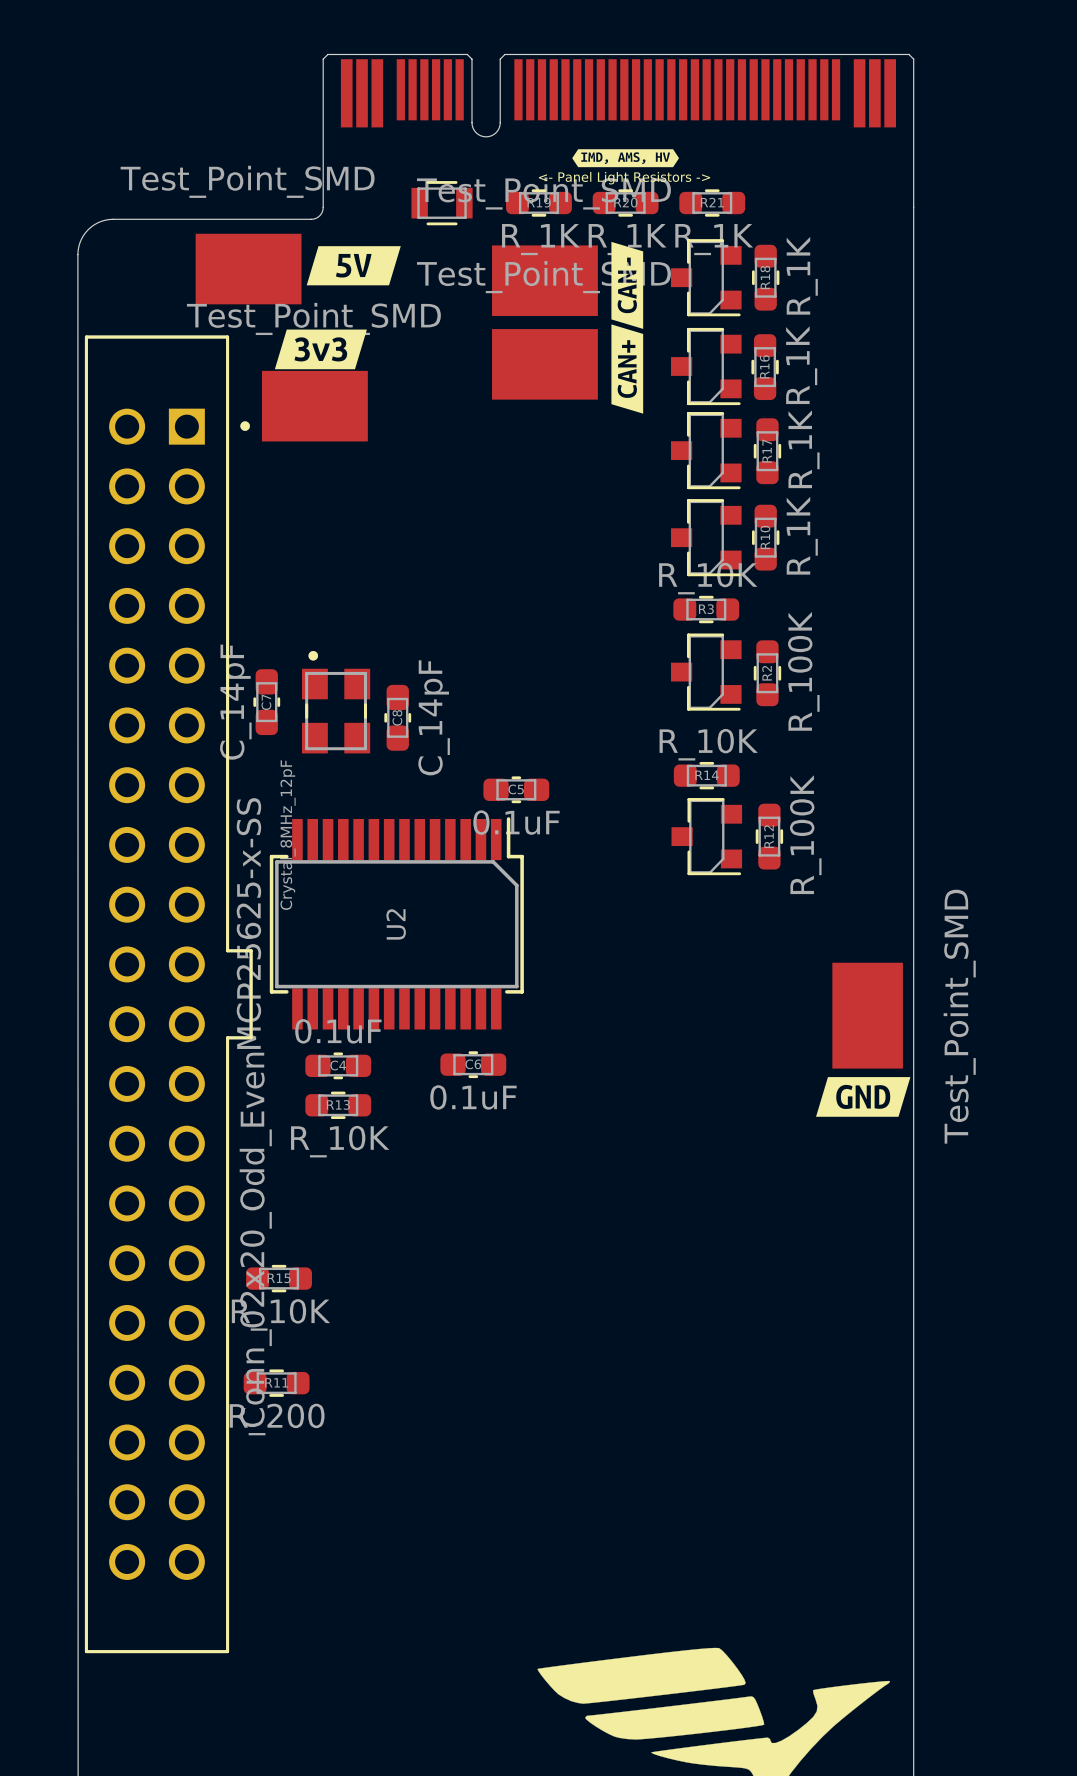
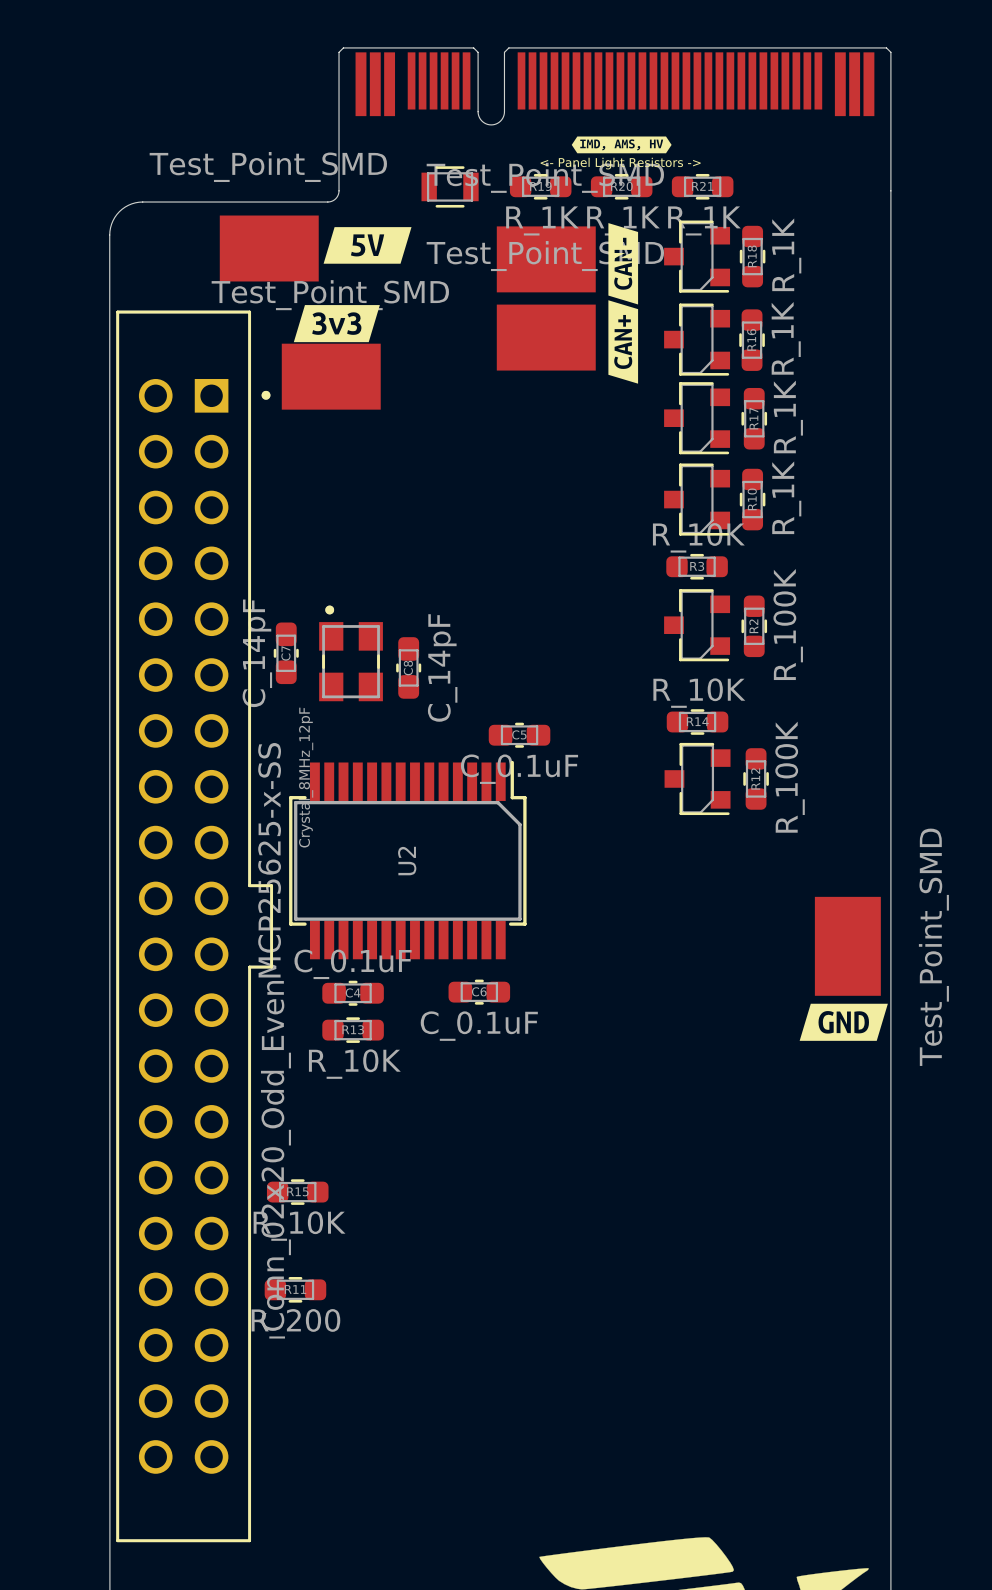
C5 value: 0.1uF (516, 822) -> C_0.1uF (519, 769)
C4 value: 0.1uF (338, 1031) -> C_0.1uF (353, 964)
C6 value: 0.1uF (473, 1097) -> C_0.1uF (479, 1026)

